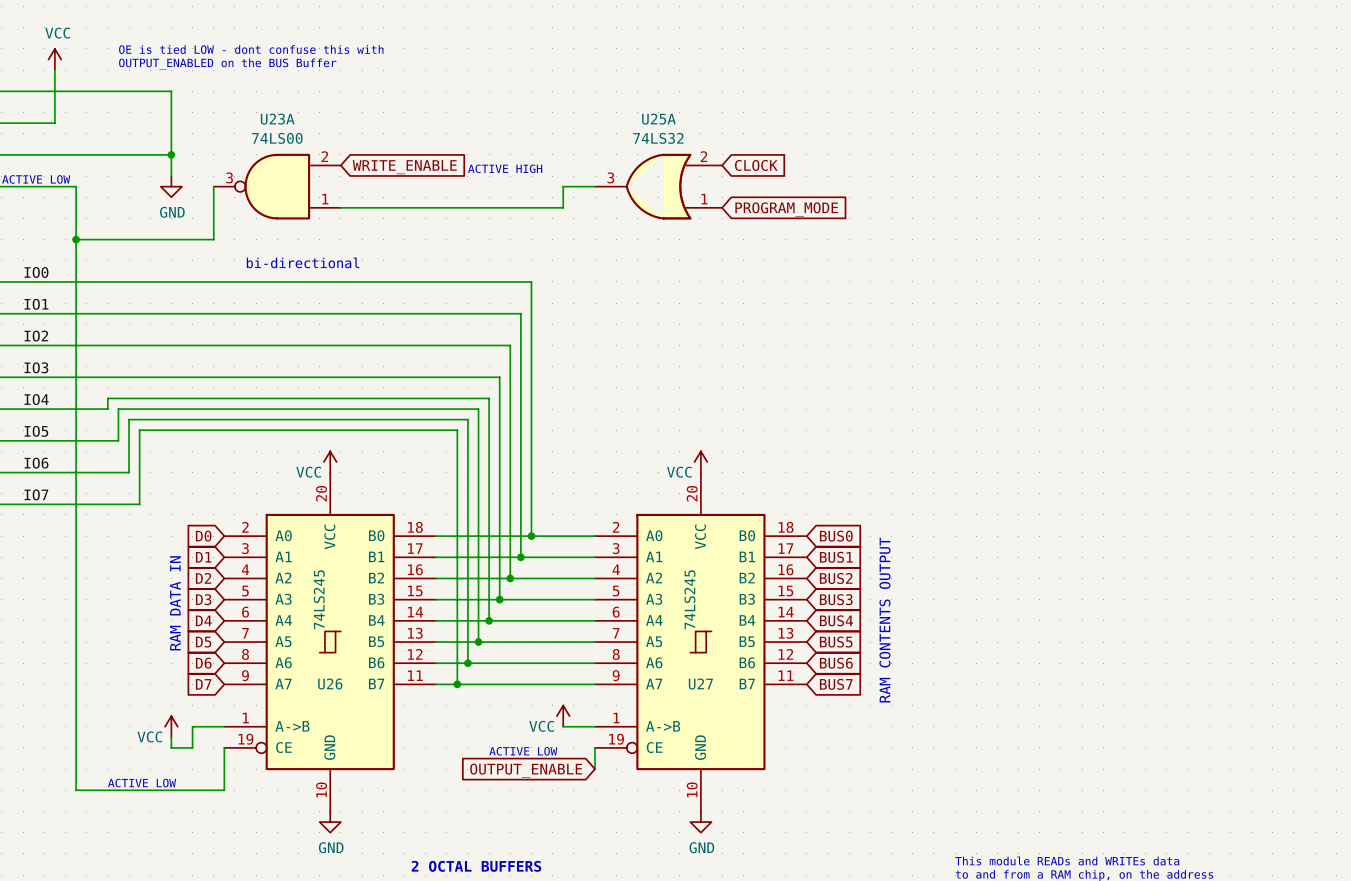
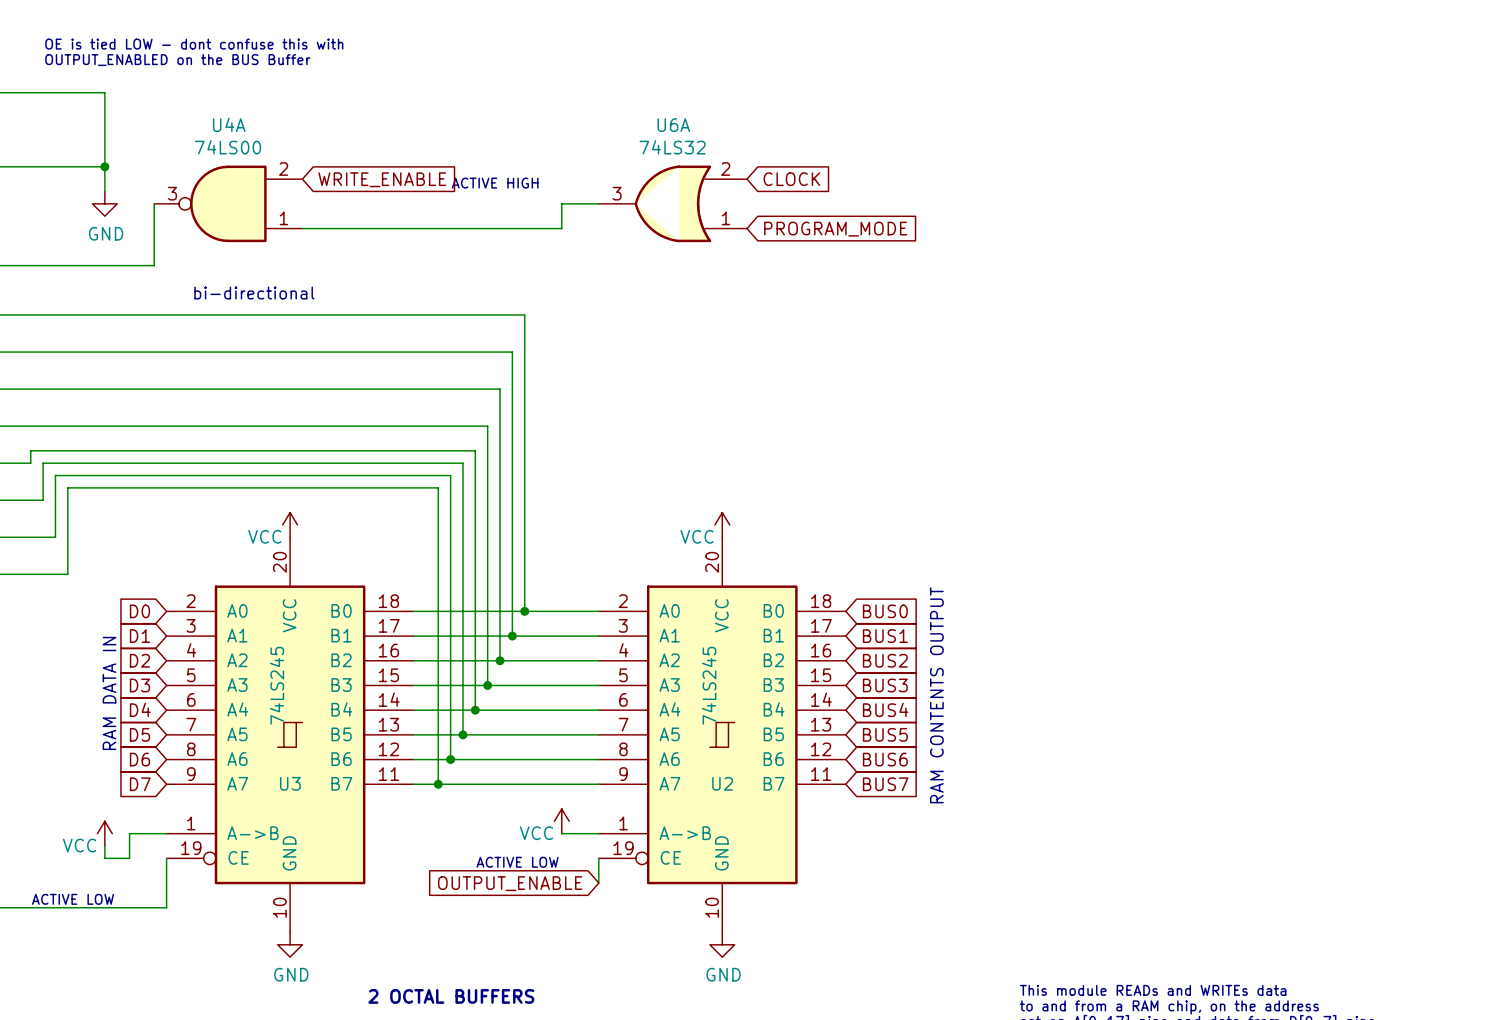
U23A name: U23A (277, 119) -> U4A (229, 124)
U25A name: U25A (658, 119) -> U6A (673, 125)
U26 name: U26 (330, 684) -> U3 (290, 783)
U27 name: U27 (700, 684) -> U2 (722, 783)

